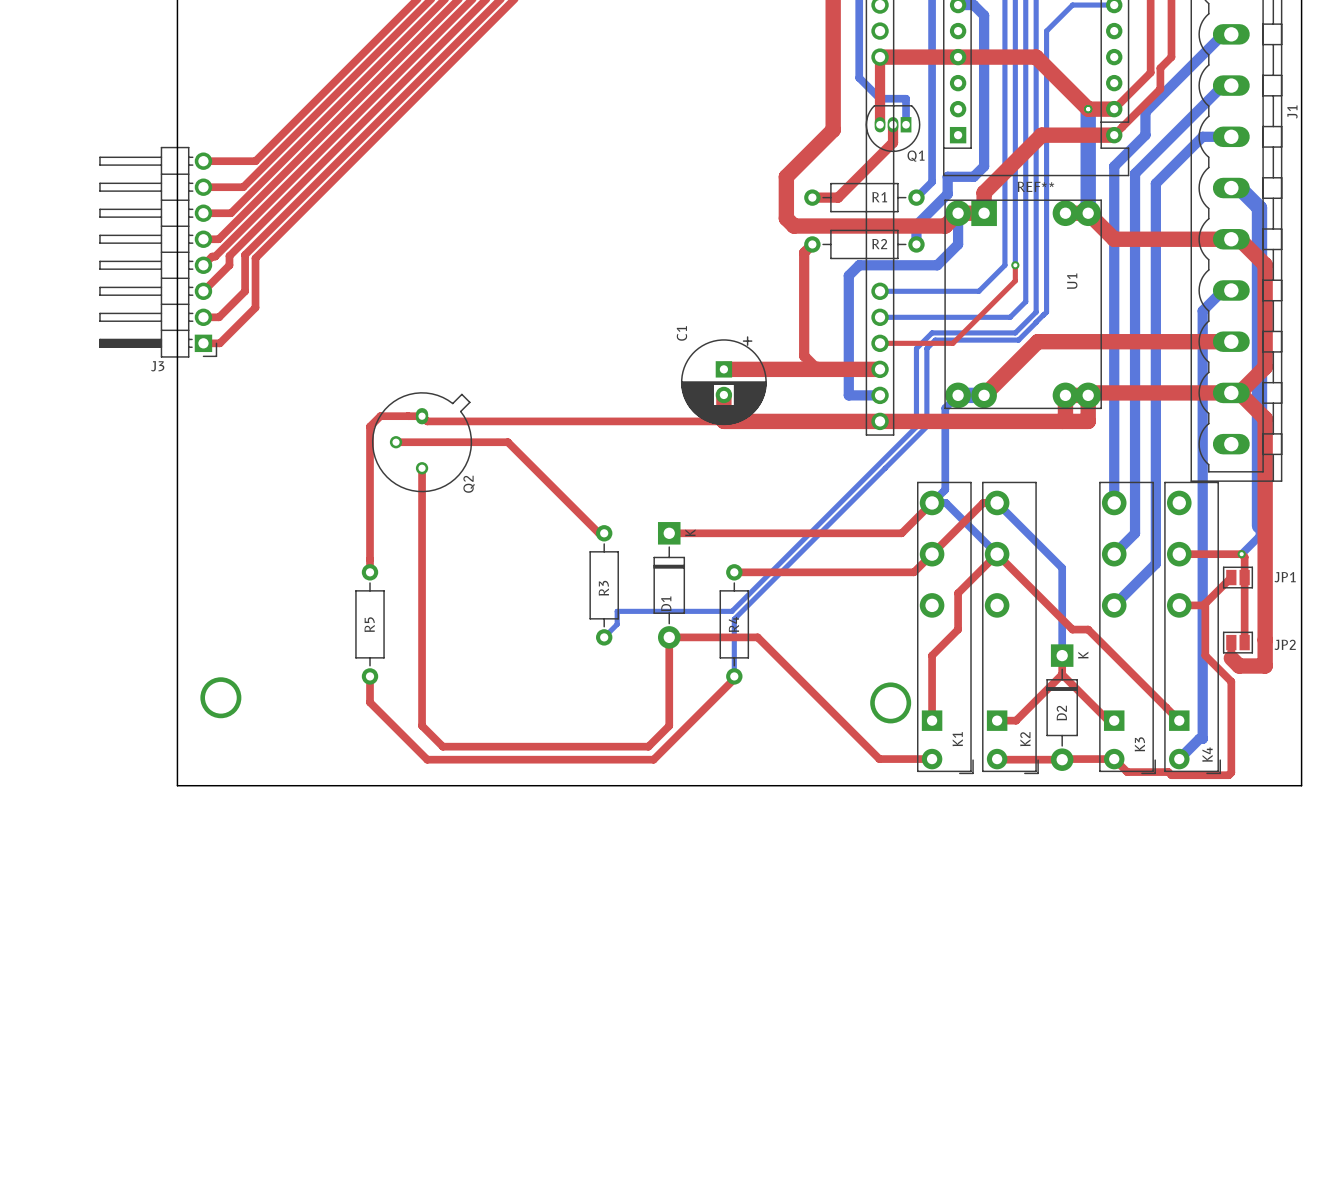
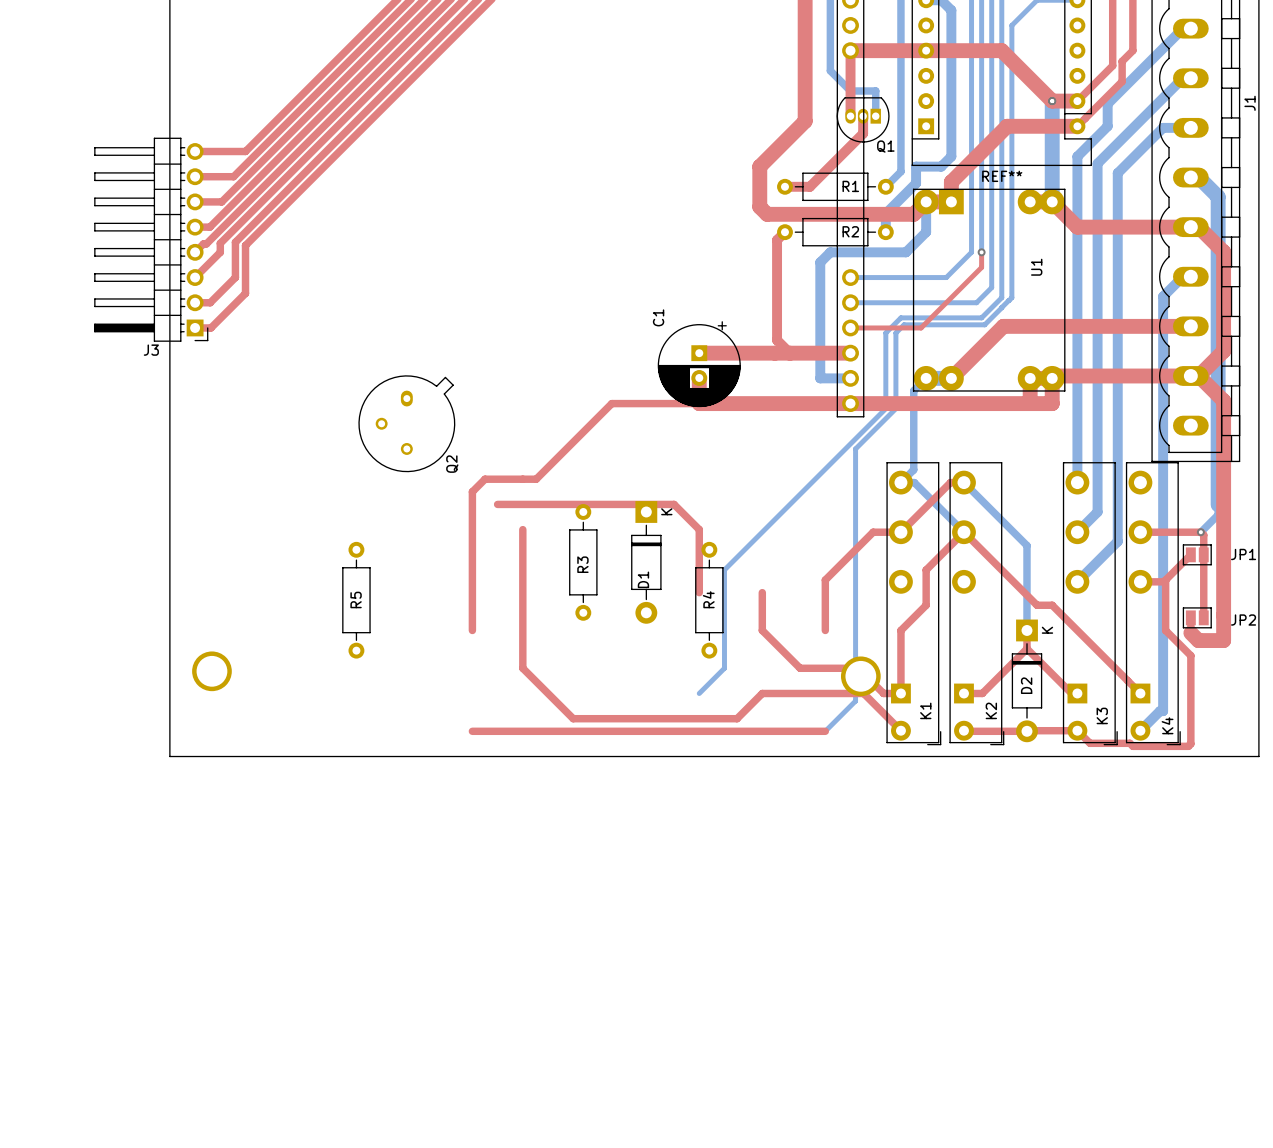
top track: (633, 421) (427, 421) (422, 416) (380, 416) (370, 426) (370, 572) -> (611, 403) (536, 479) (485, 479) (472, 491) (472, 630)
bottom track: (916, 426) (731, 611) (617, 611) (617, 624) (604, 637) -> (885, 408) (724, 569) (724, 668) (699, 693)
top track: (396, 442) (507, 442) (598, 533) (604, 533) -> none
top track: (422, 468) (422, 725) (442, 746) (593, 746) -> (522, 529) (522, 668) (573, 718)
bottom track: (885, 468) (734, 619) (734, 676) -> (855, 448) (855, 701) (825, 731)
top track: (932, 502) (901, 533) (669, 533) -> none
top track: none -> (497, 504) (674, 504) (699, 529) (699, 592)
top track: (932, 554) (913, 572) (734, 572) -> (900, 532) (873, 532) (825, 580) (825, 630)
top track: none -> (762, 592) (762, 630) (800, 668) (858, 668) (883, 693) (900, 693)
top track: (370, 676) (370, 702) (427, 759) (489, 759) -> none
top track: (734, 676) (734, 679) (653, 759) -> (825, 731) (631, 731)
top track: (648, 746) (669, 725) (669, 637) (757, 637) (879, 759) (932, 759) -> (626, 718) (737, 718) (762, 693) (863, 693) (900, 730)

